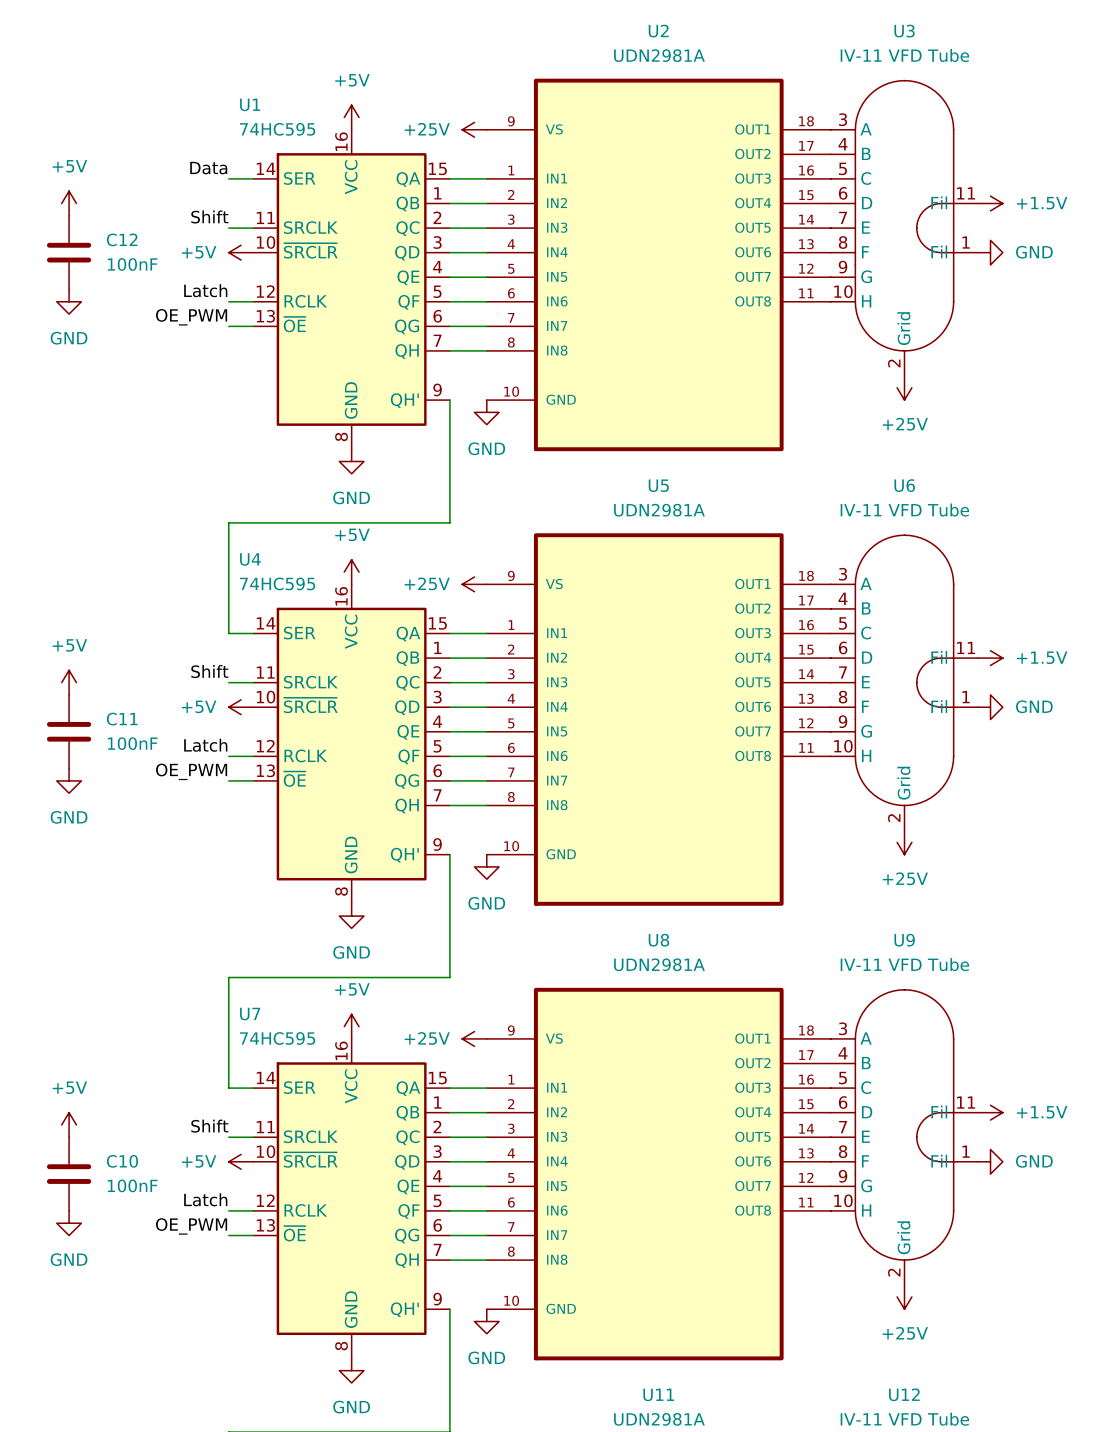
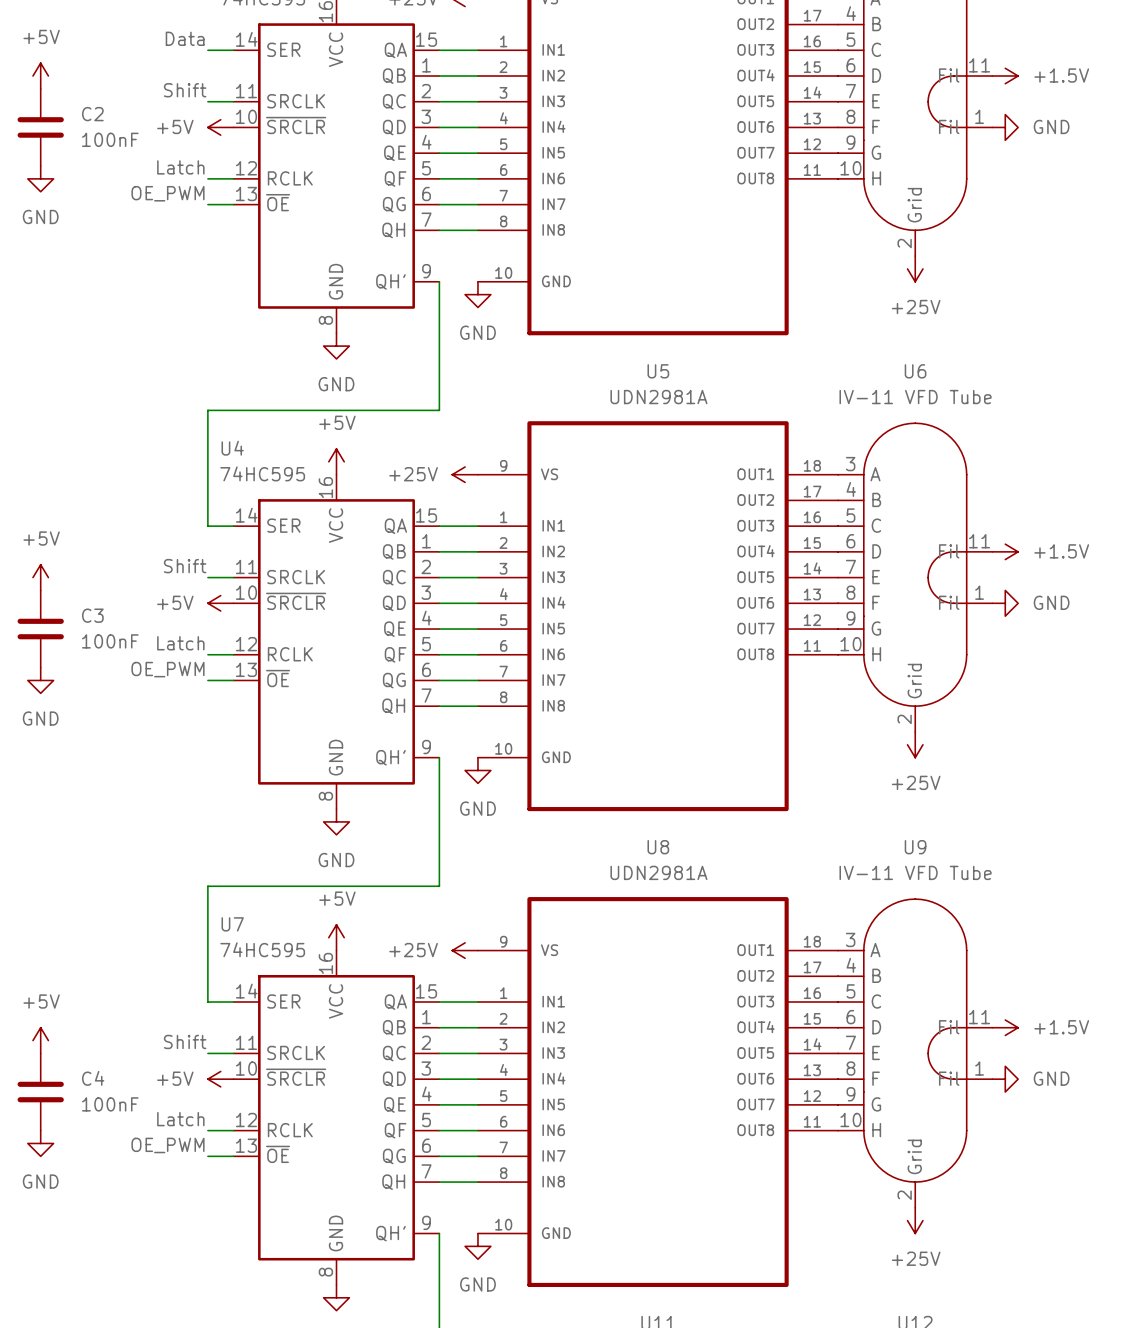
C12 name: C12 (122, 239) -> C2 (92, 114)
C11 name: C11 (122, 719) -> C3 (92, 615)
C10 name: C10 (122, 1161) -> C4 (93, 1078)

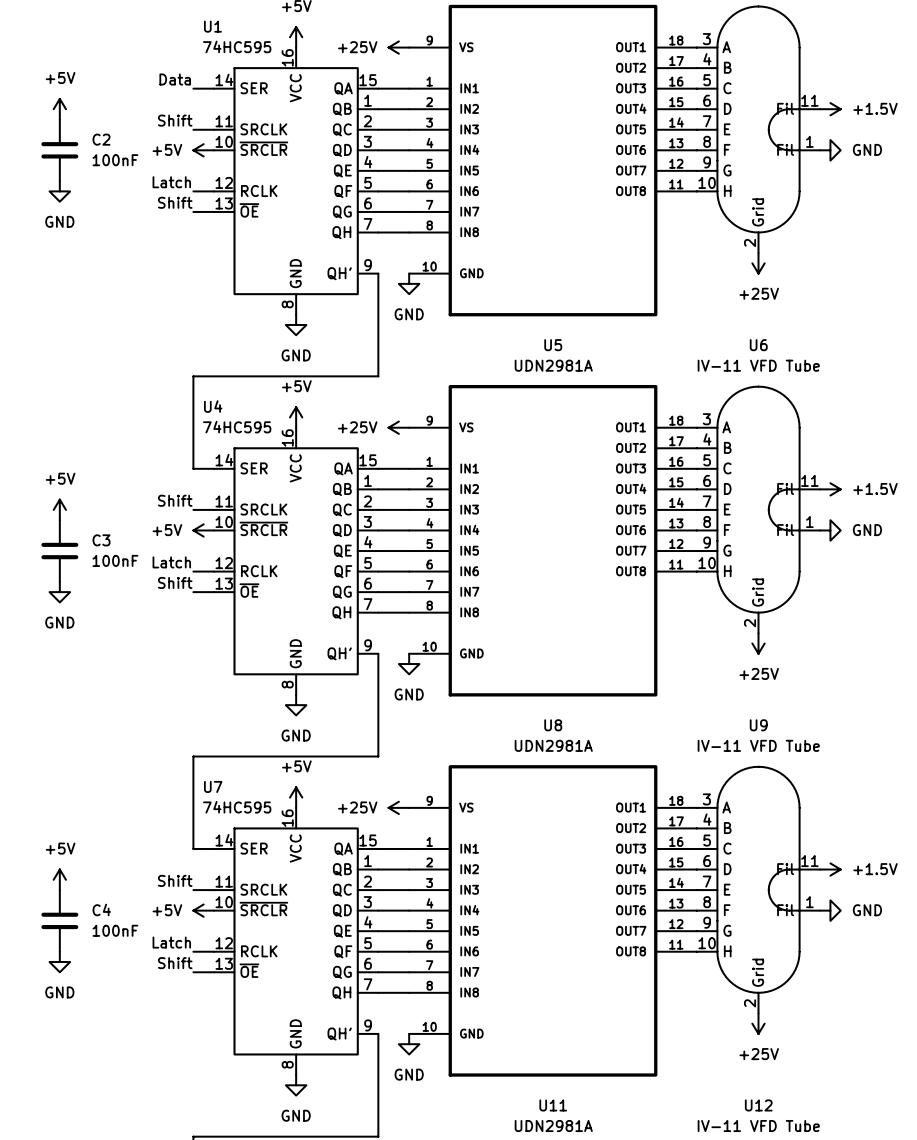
label: OE_PWM (167, 193) -> Shift (175, 202)
label: OE_PWM (167, 669) -> Shift (175, 582)
label: OE_PWM (167, 1145) -> Shift (175, 963)

